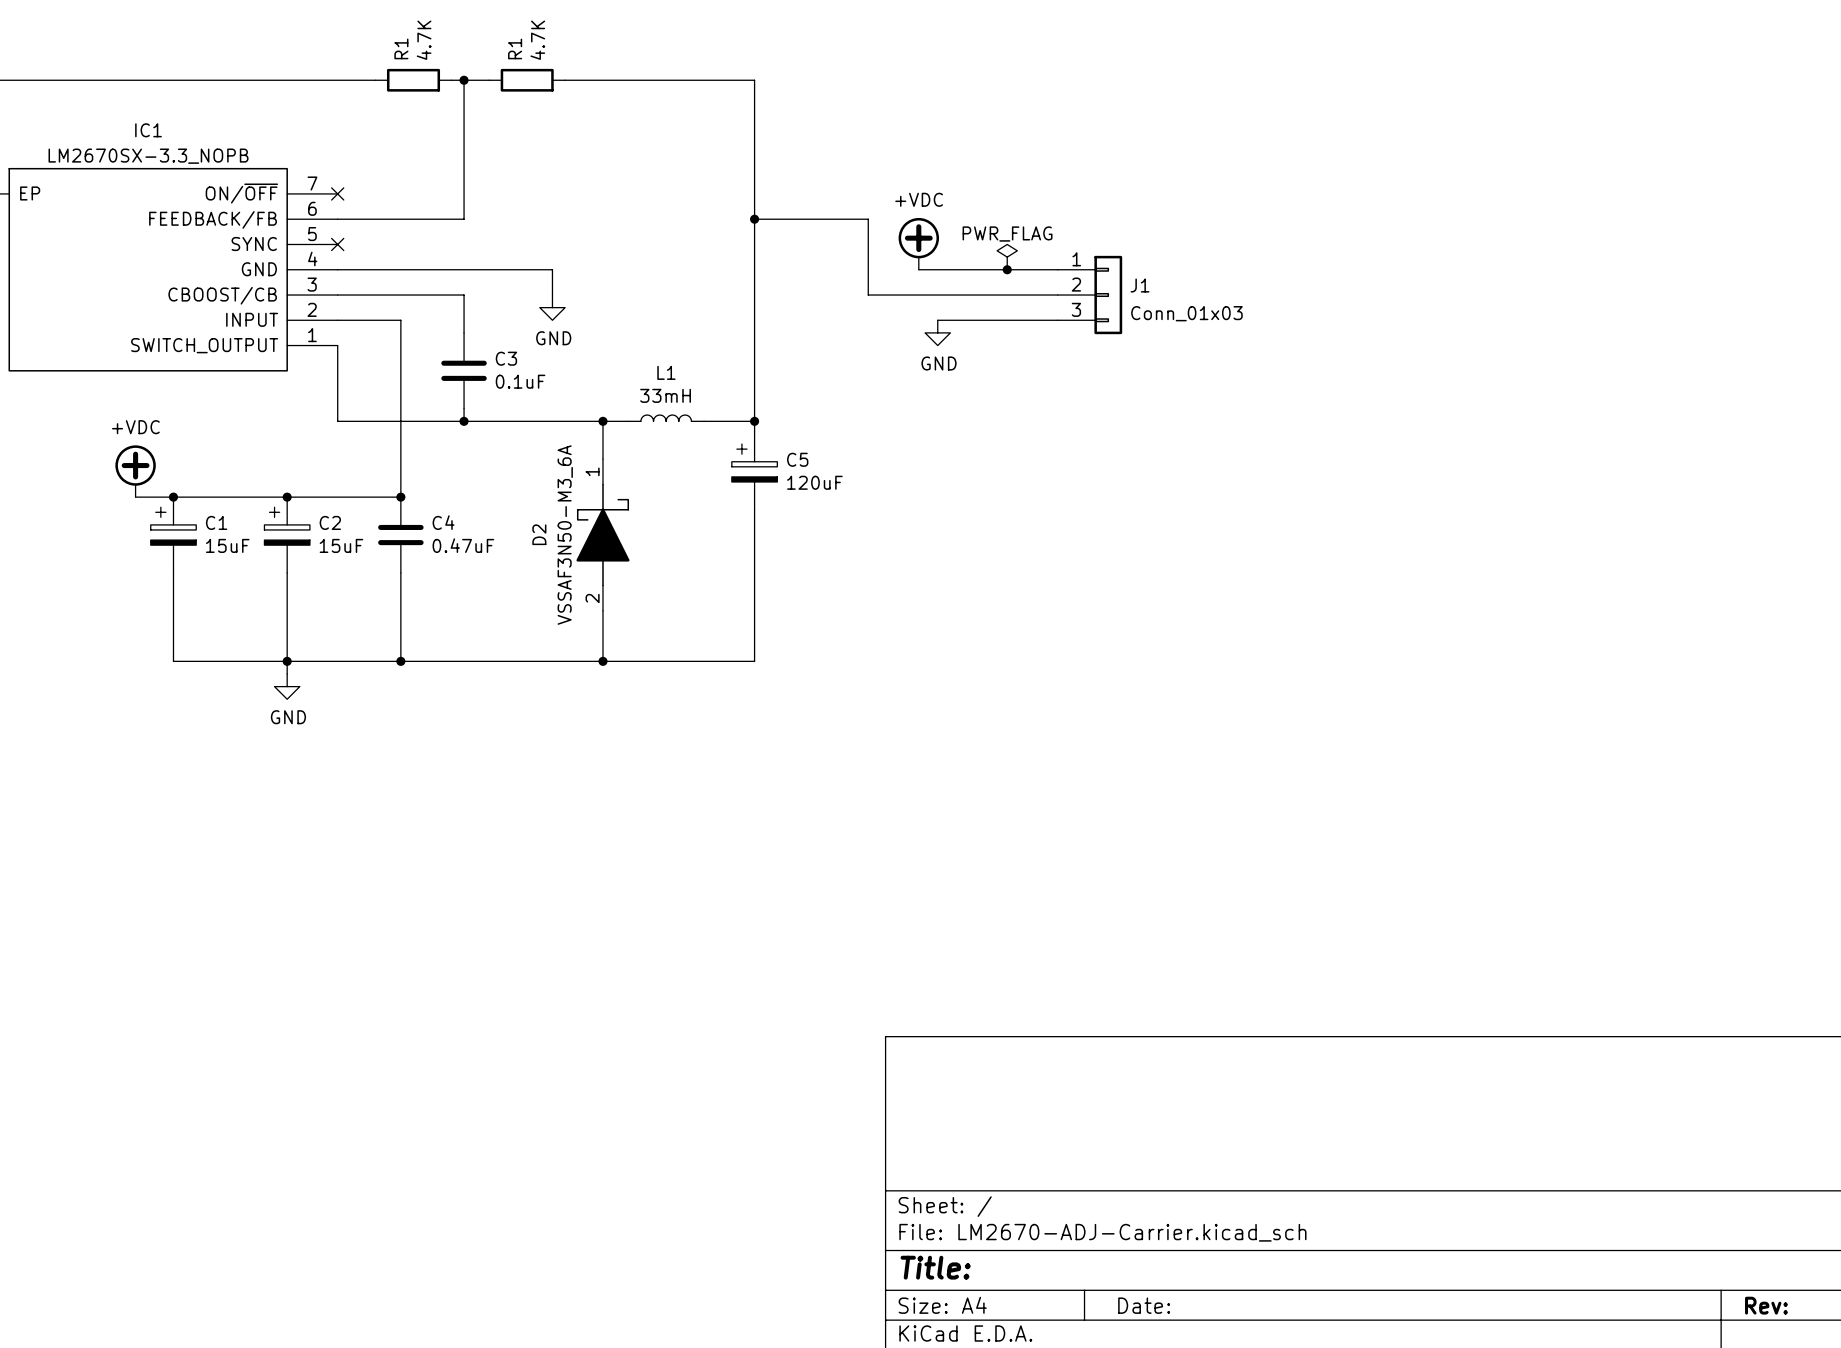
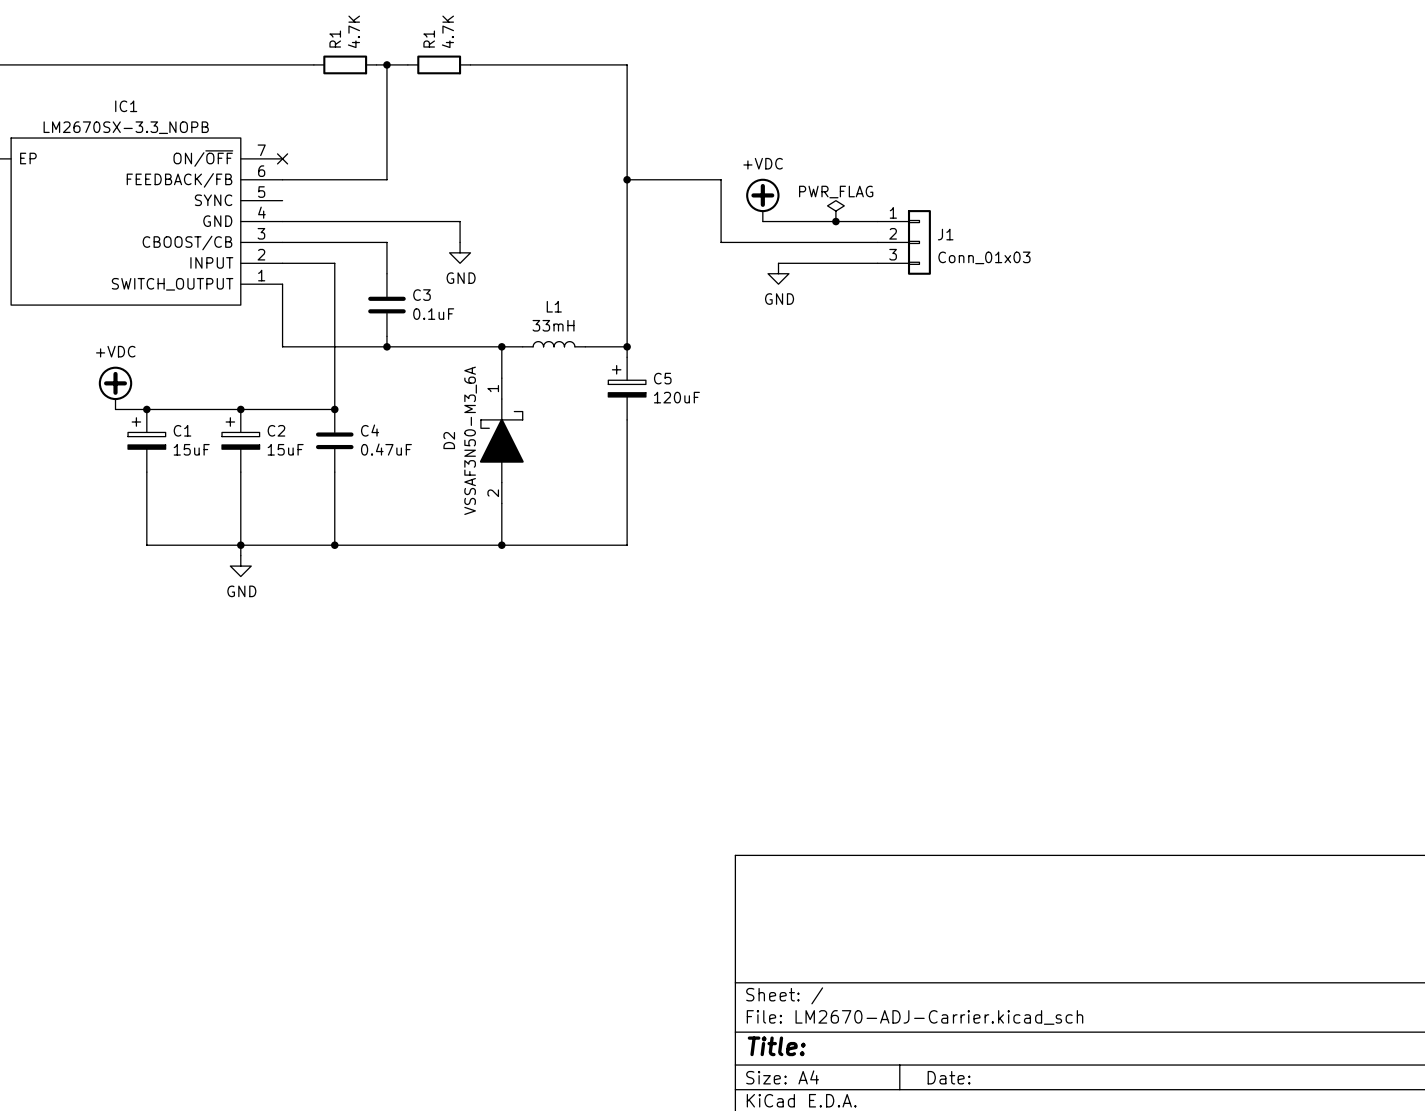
no-connect mark: (337, 244) -> none

